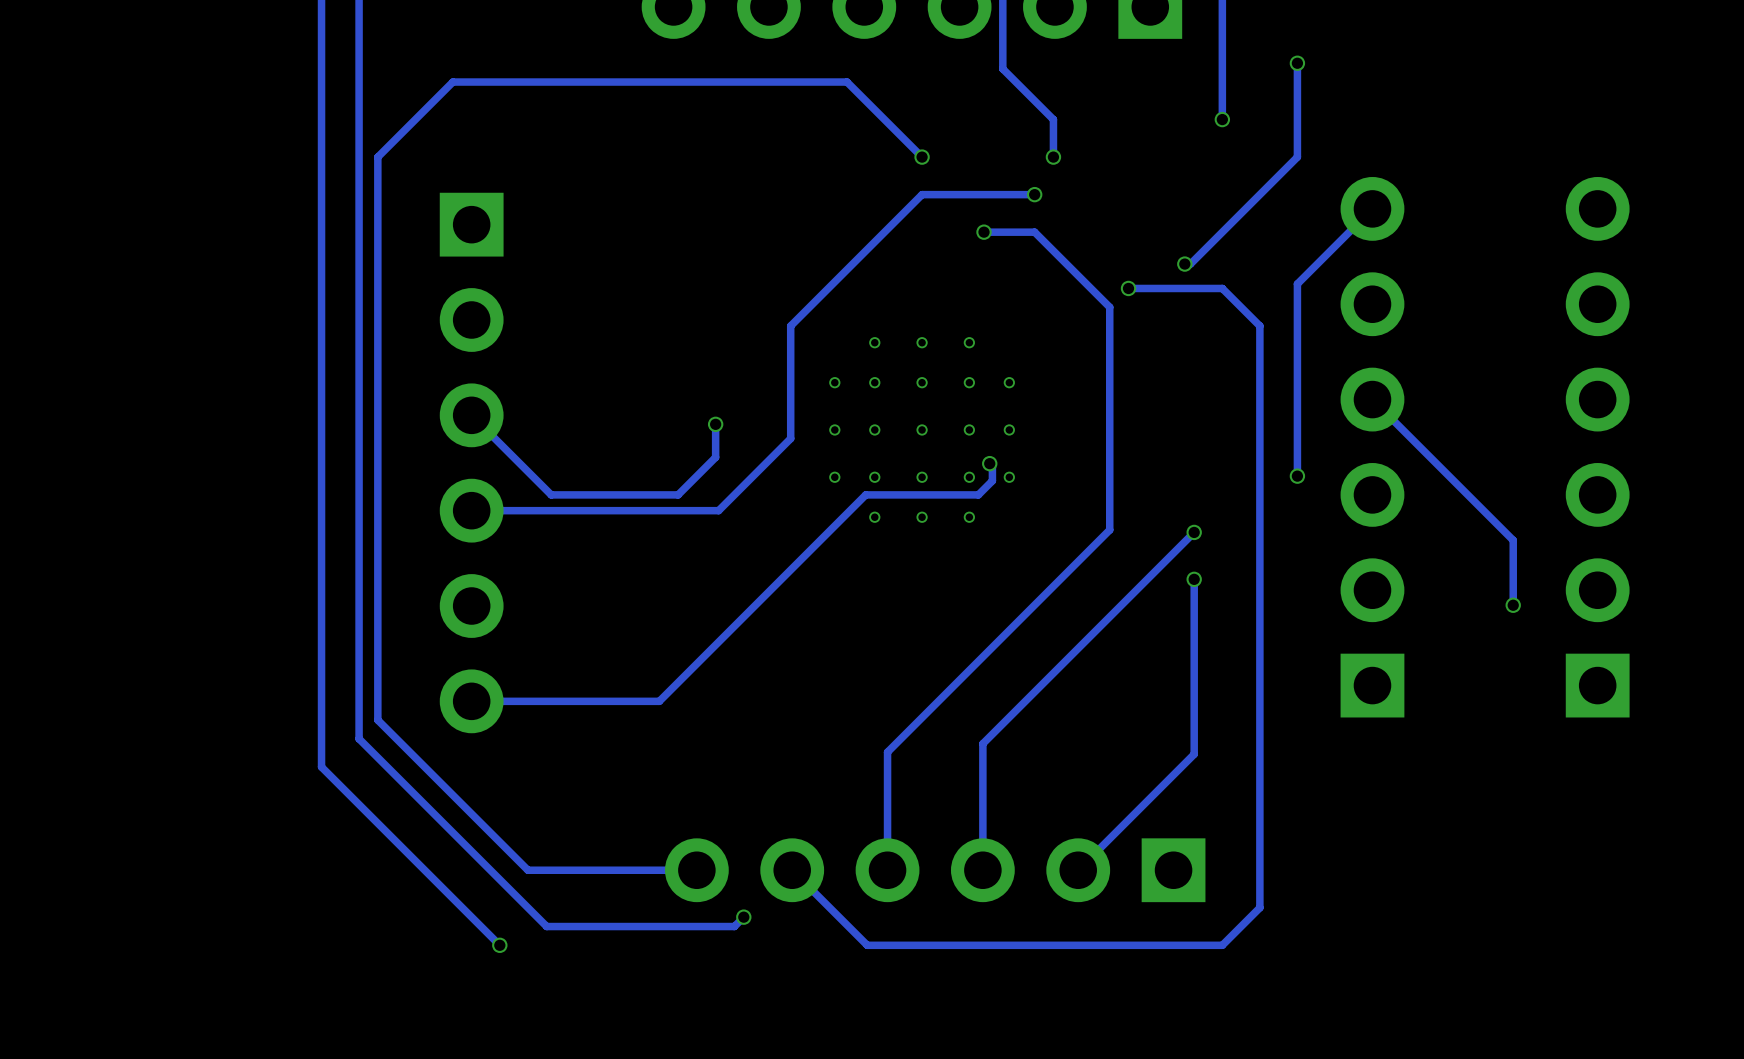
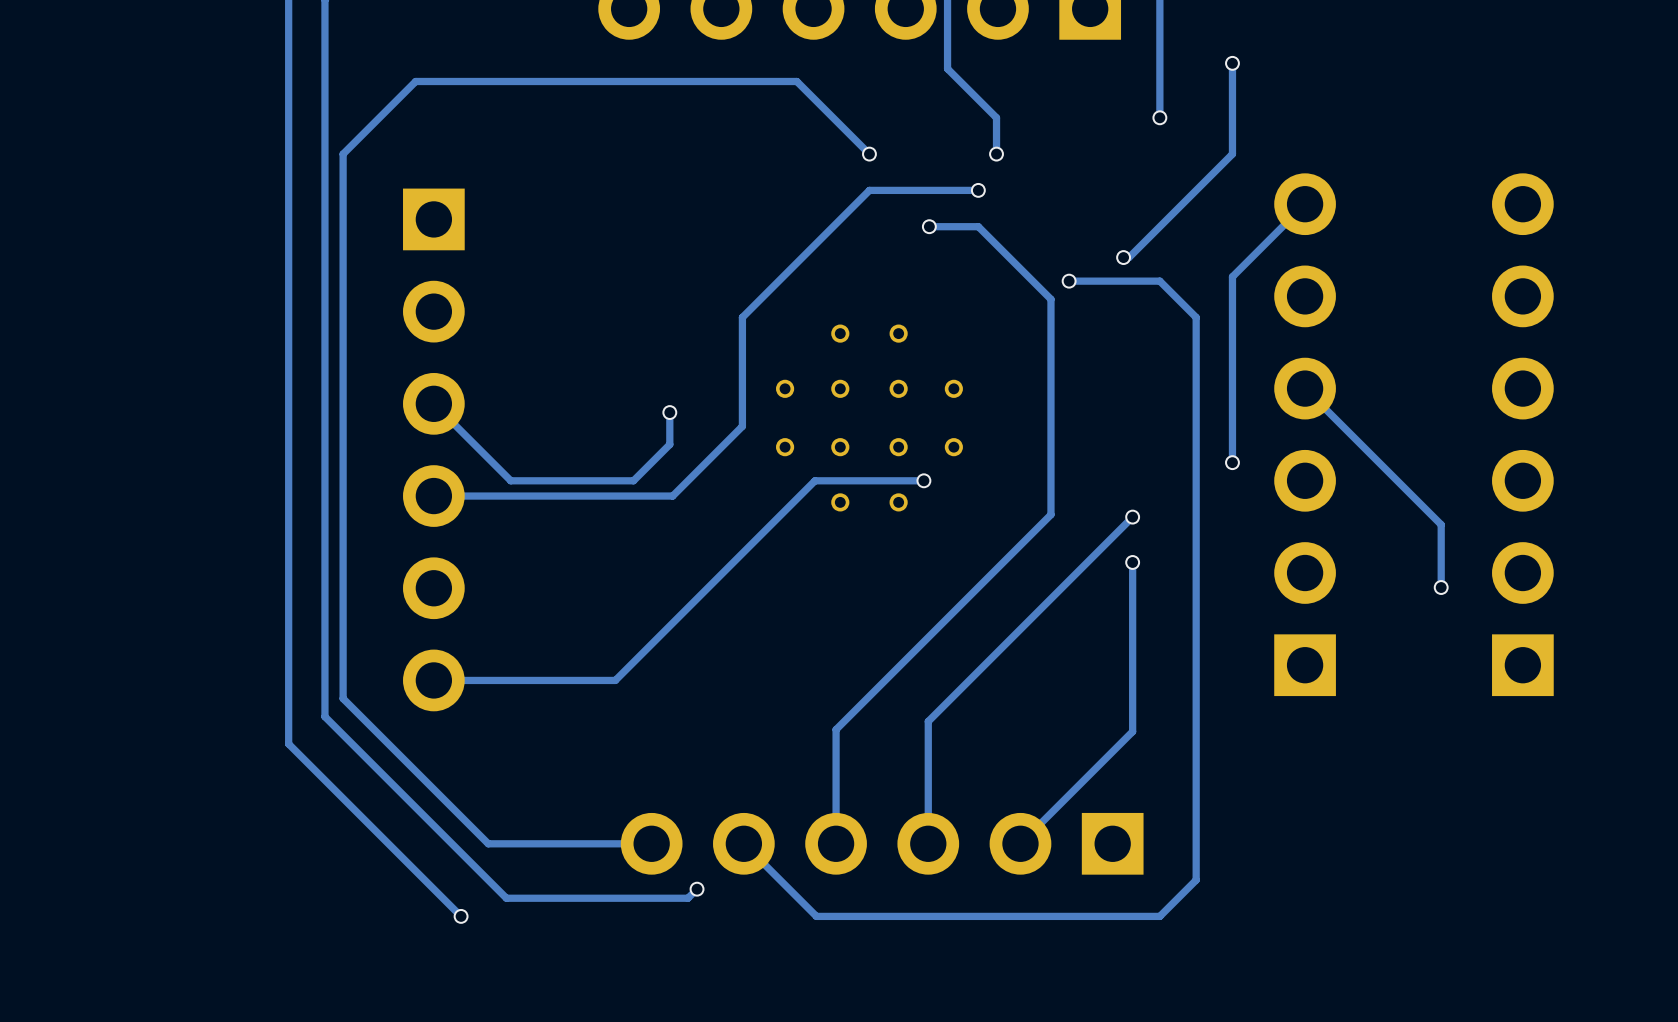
part footprint: [829, 337, 1015, 523] -> [775, 324, 963, 512]
track: (989, 463) (992, 466) (992, 480) (978, 494) -> none
via position: (989, 463) -> (923, 480)

